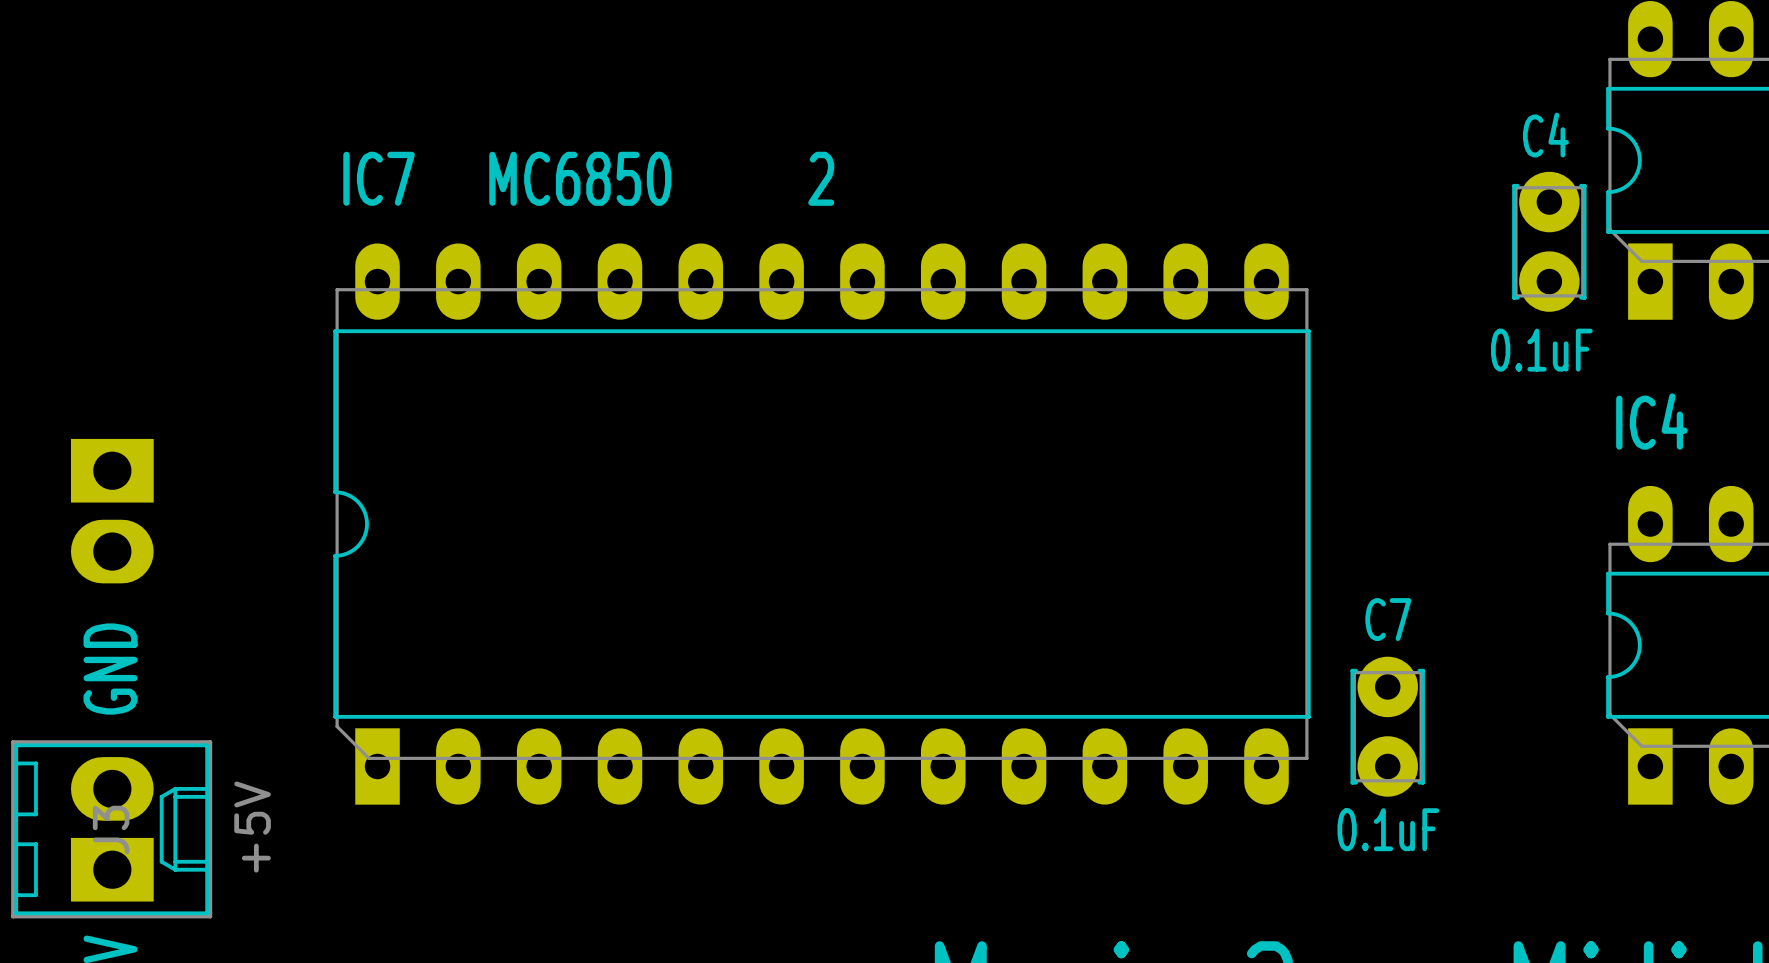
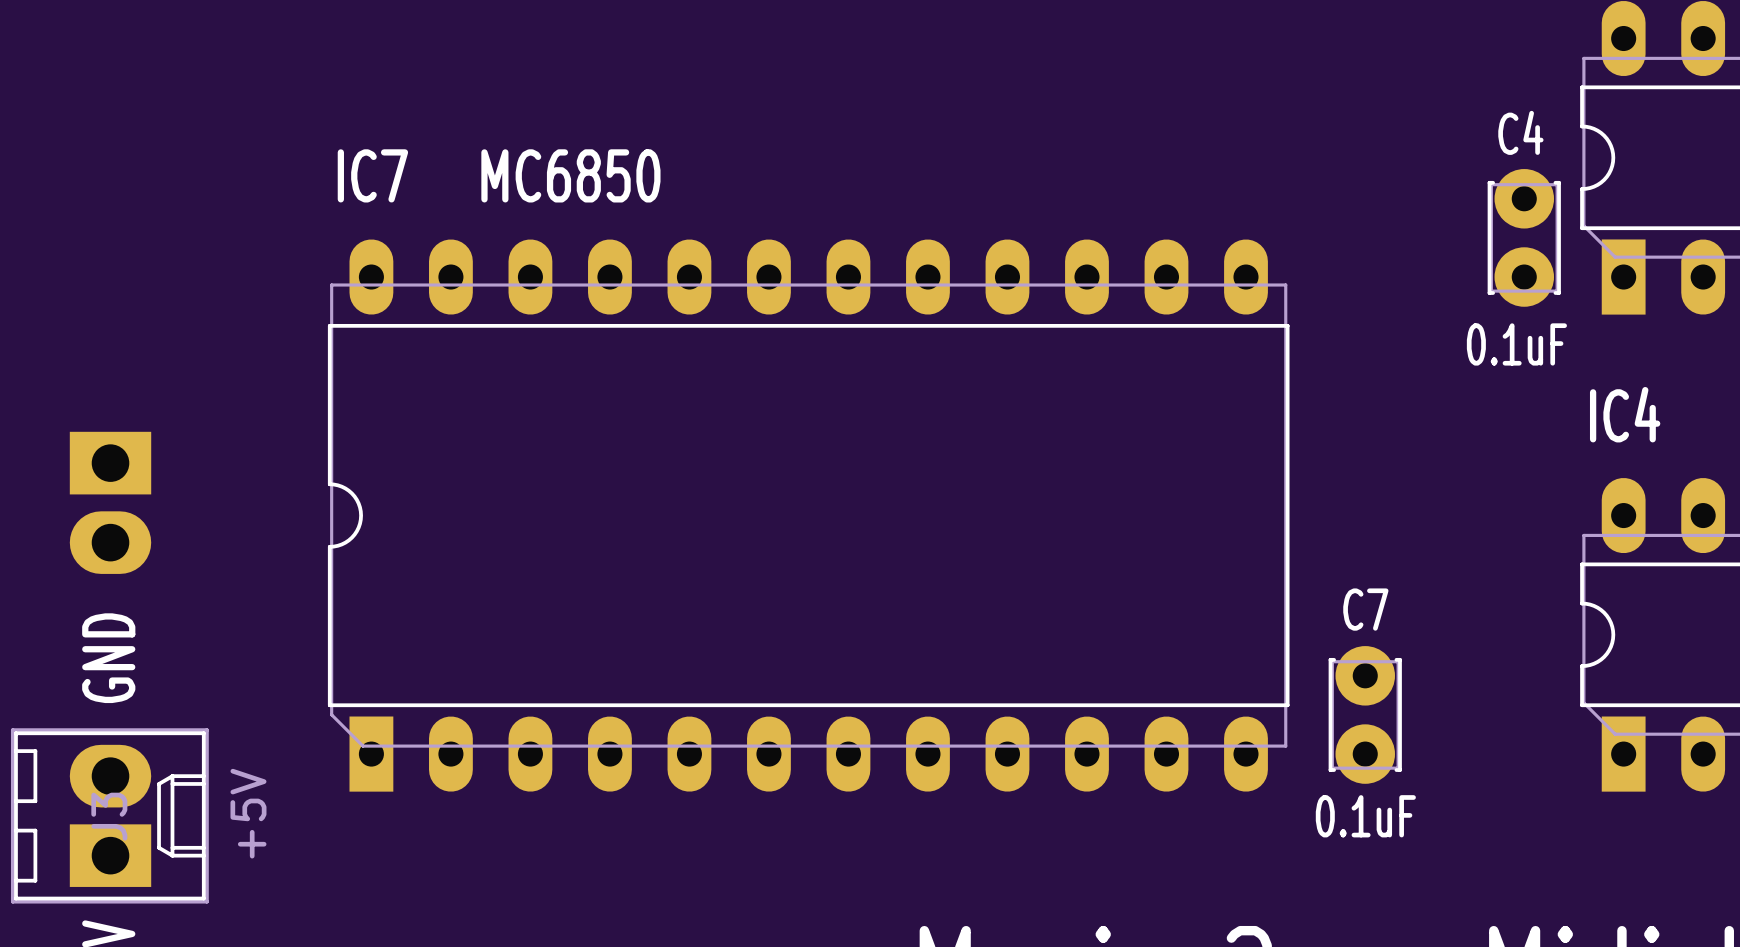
text: 2 (821, 178) -> none

